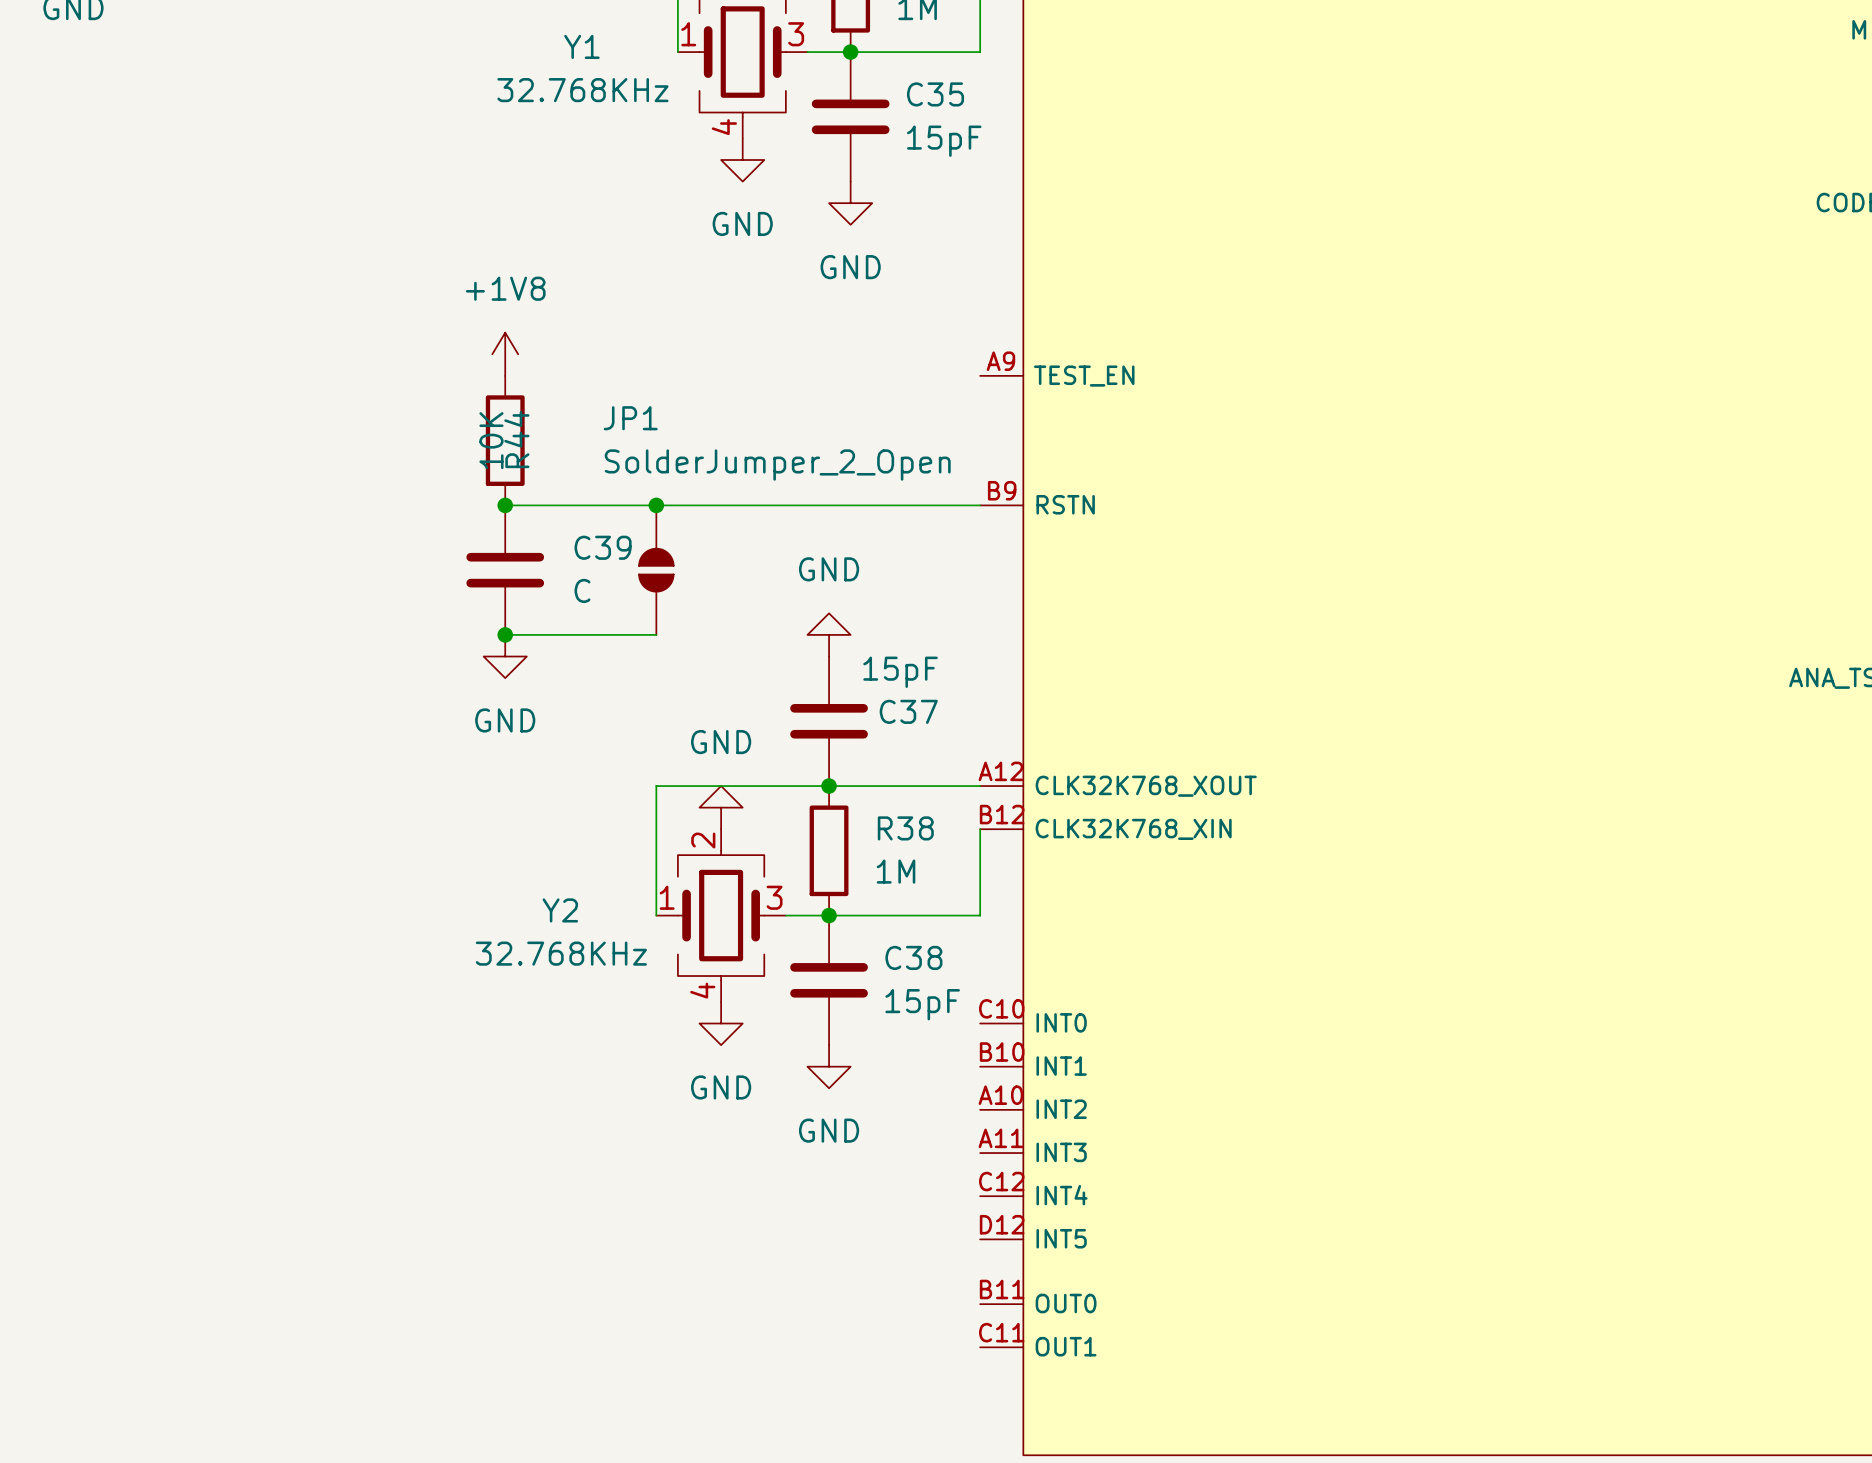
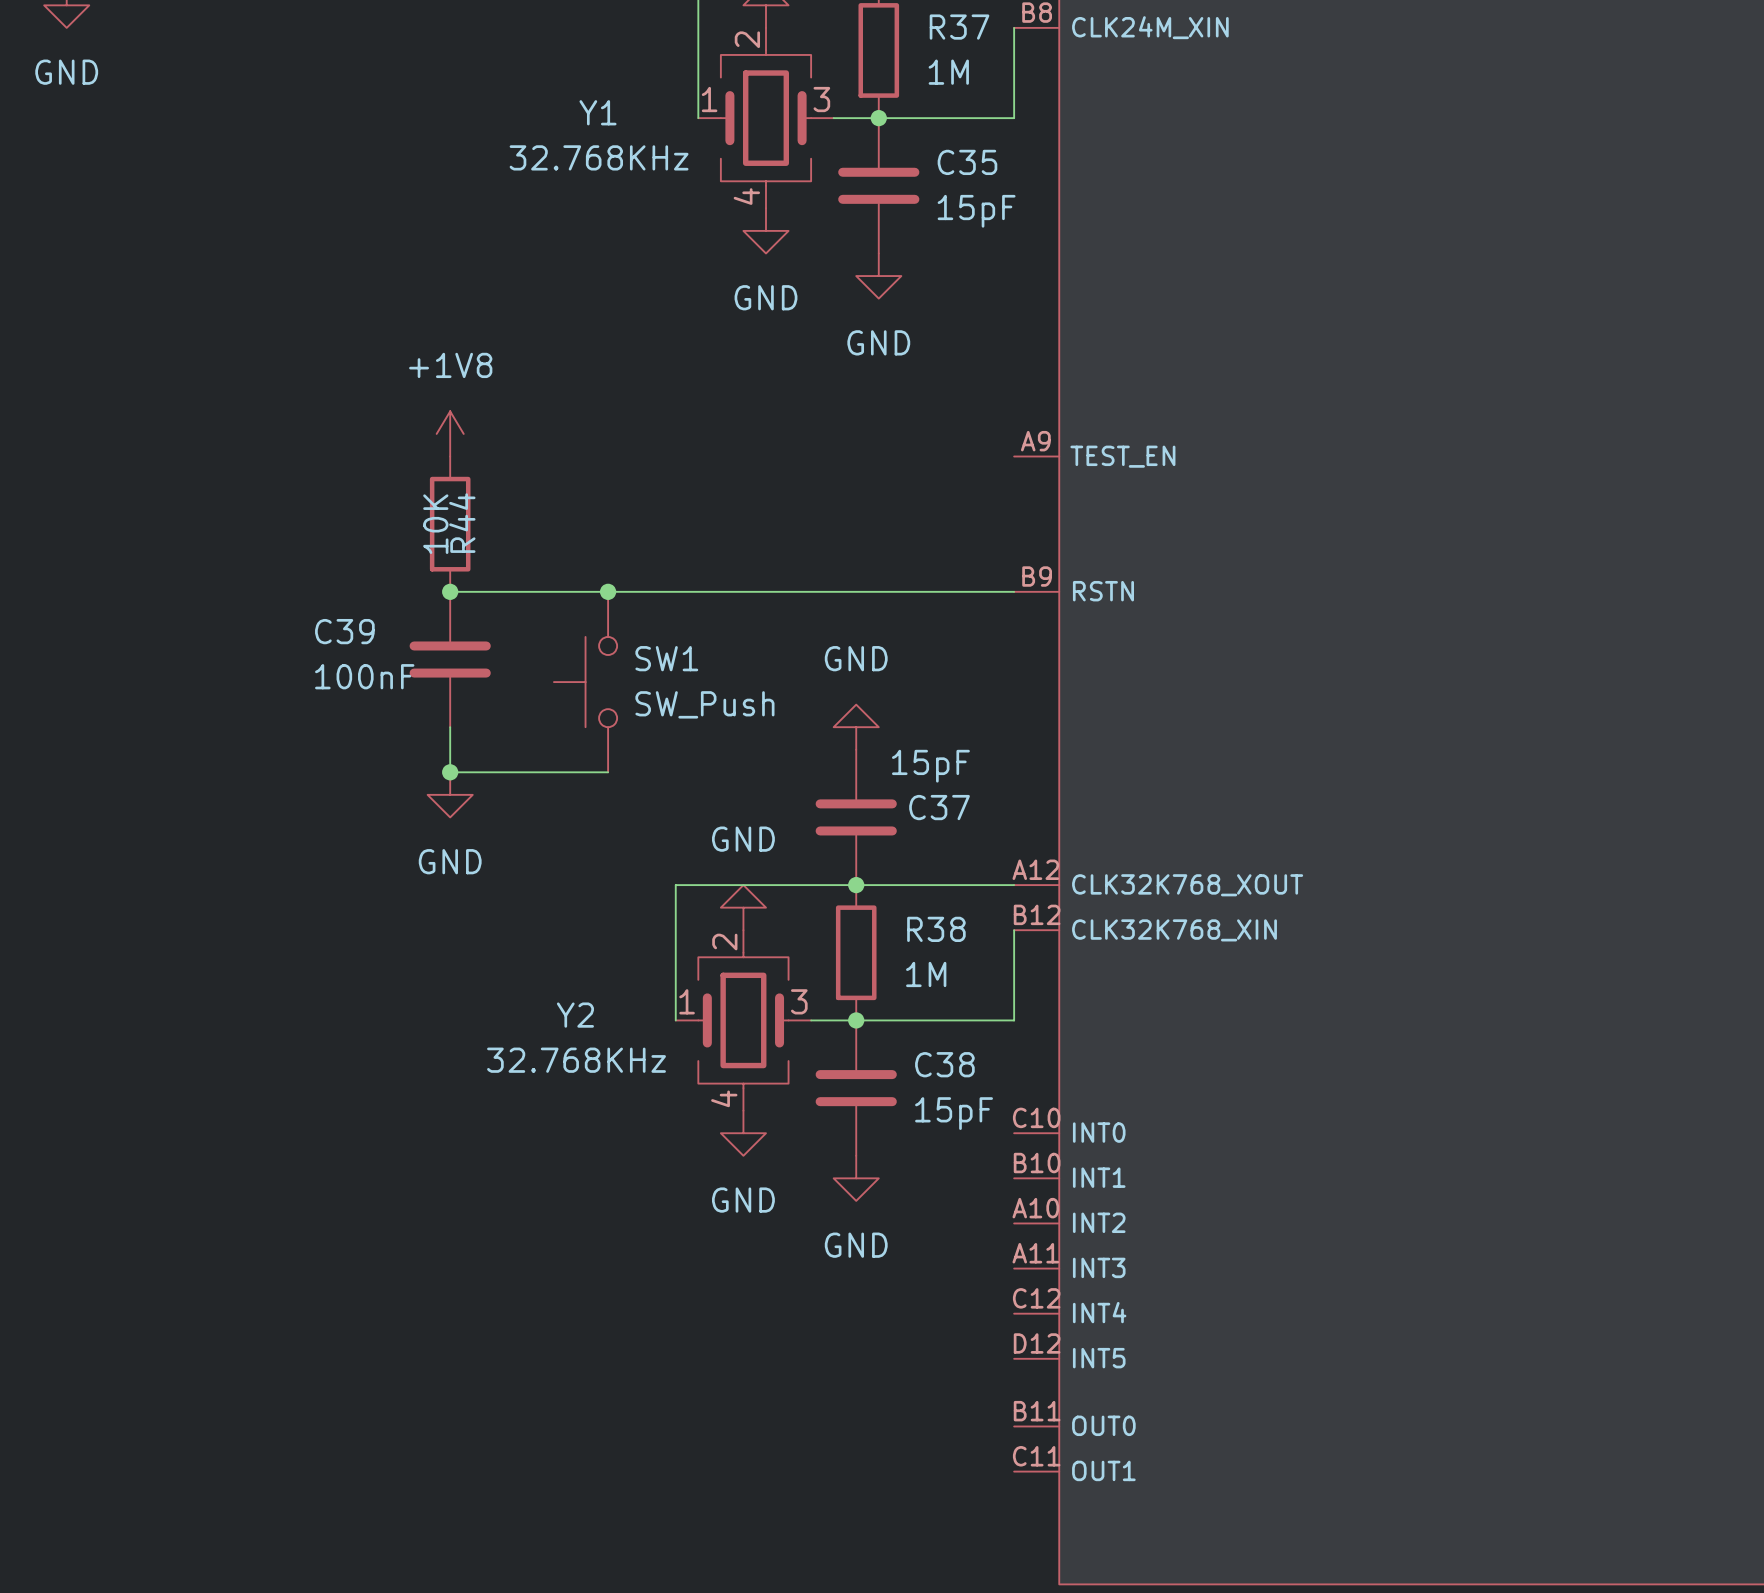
power symbol position: +1V8 (505, 354) -> +1V8 (450, 433)
R44 position: (505, 440) -> (450, 524)
wire: none -> (450, 591) (517, 591)
junction: none -> (450, 591)
junction: (505, 505) -> none
junction: none -> (608, 591)
junction: (656, 505) -> none
C39 name position: C39 (603, 547) -> C39 (344, 631)
C39 position: (505, 570) -> (450, 659)
JP1: SolderJumper_2_Open (656, 570) -> none
C39 value: C (582, 590) -> 100nF (364, 676)
SW1: none -> SW_Push (585, 682)
wire: none -> (450, 727) (450, 772) (608, 772)
wire: (505, 634) (656, 634) -> none
junction: (505, 634) -> none
power symbol position: GND (505, 656) -> GND (450, 794)
junction: none -> (450, 772)

